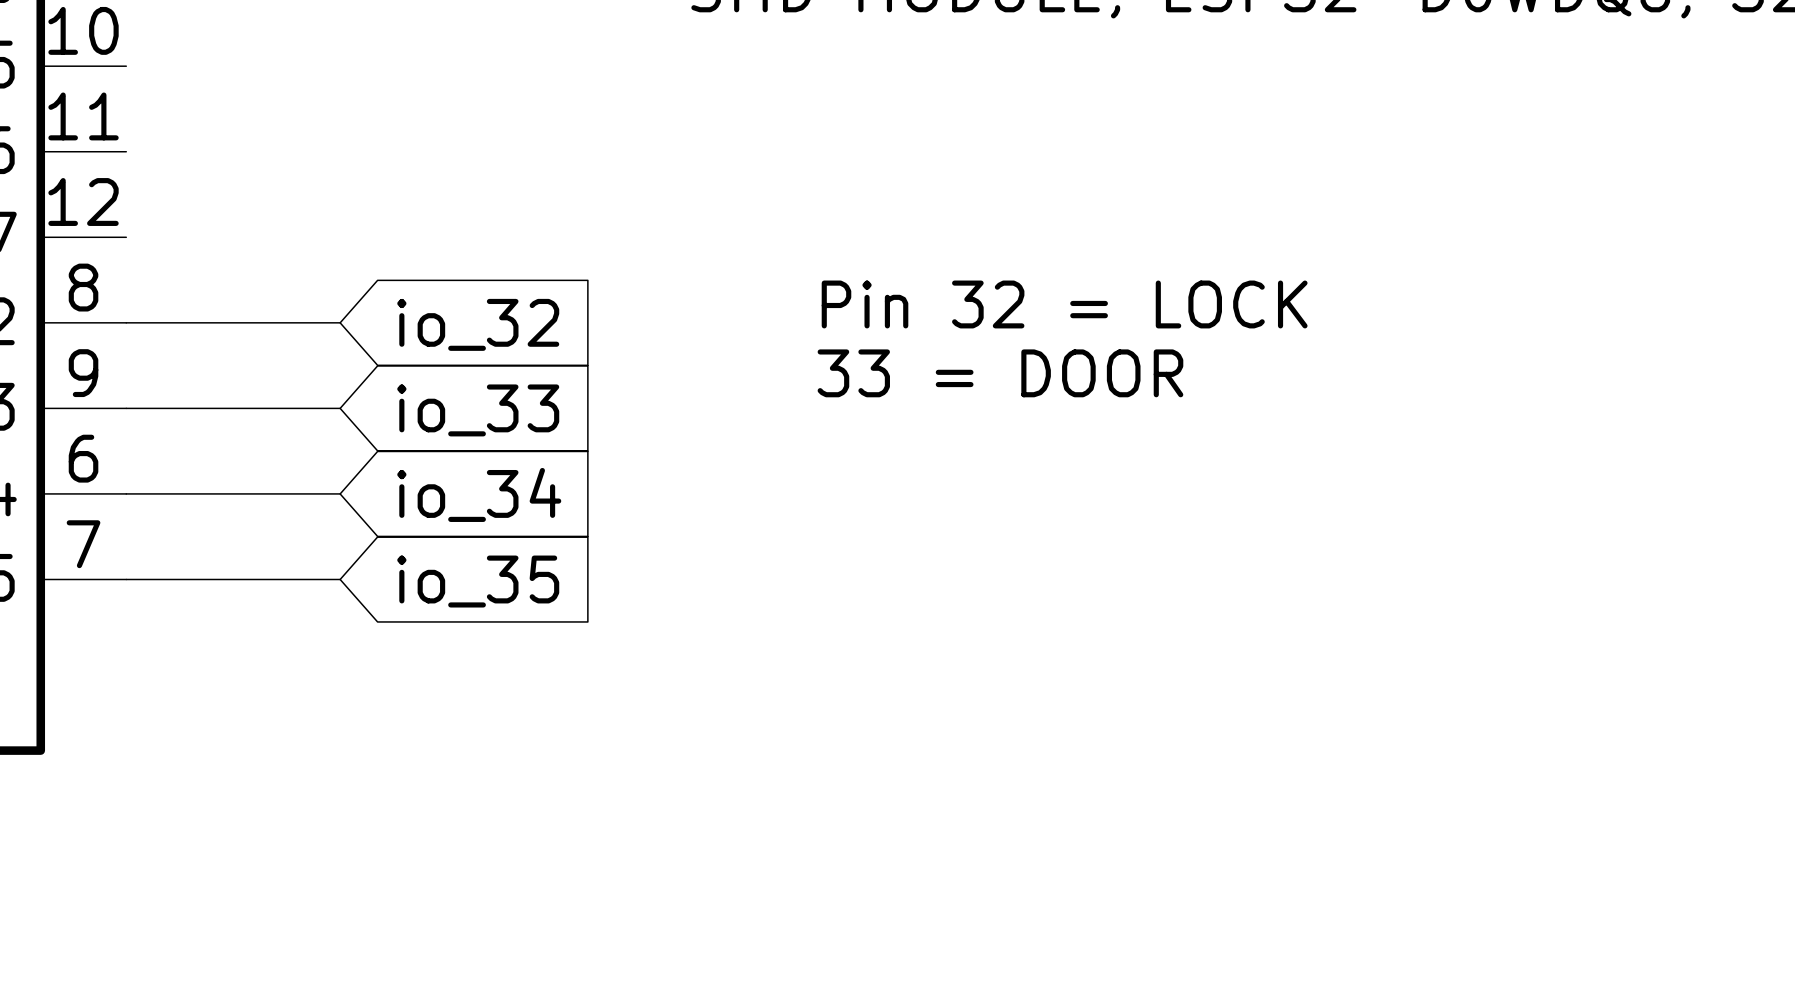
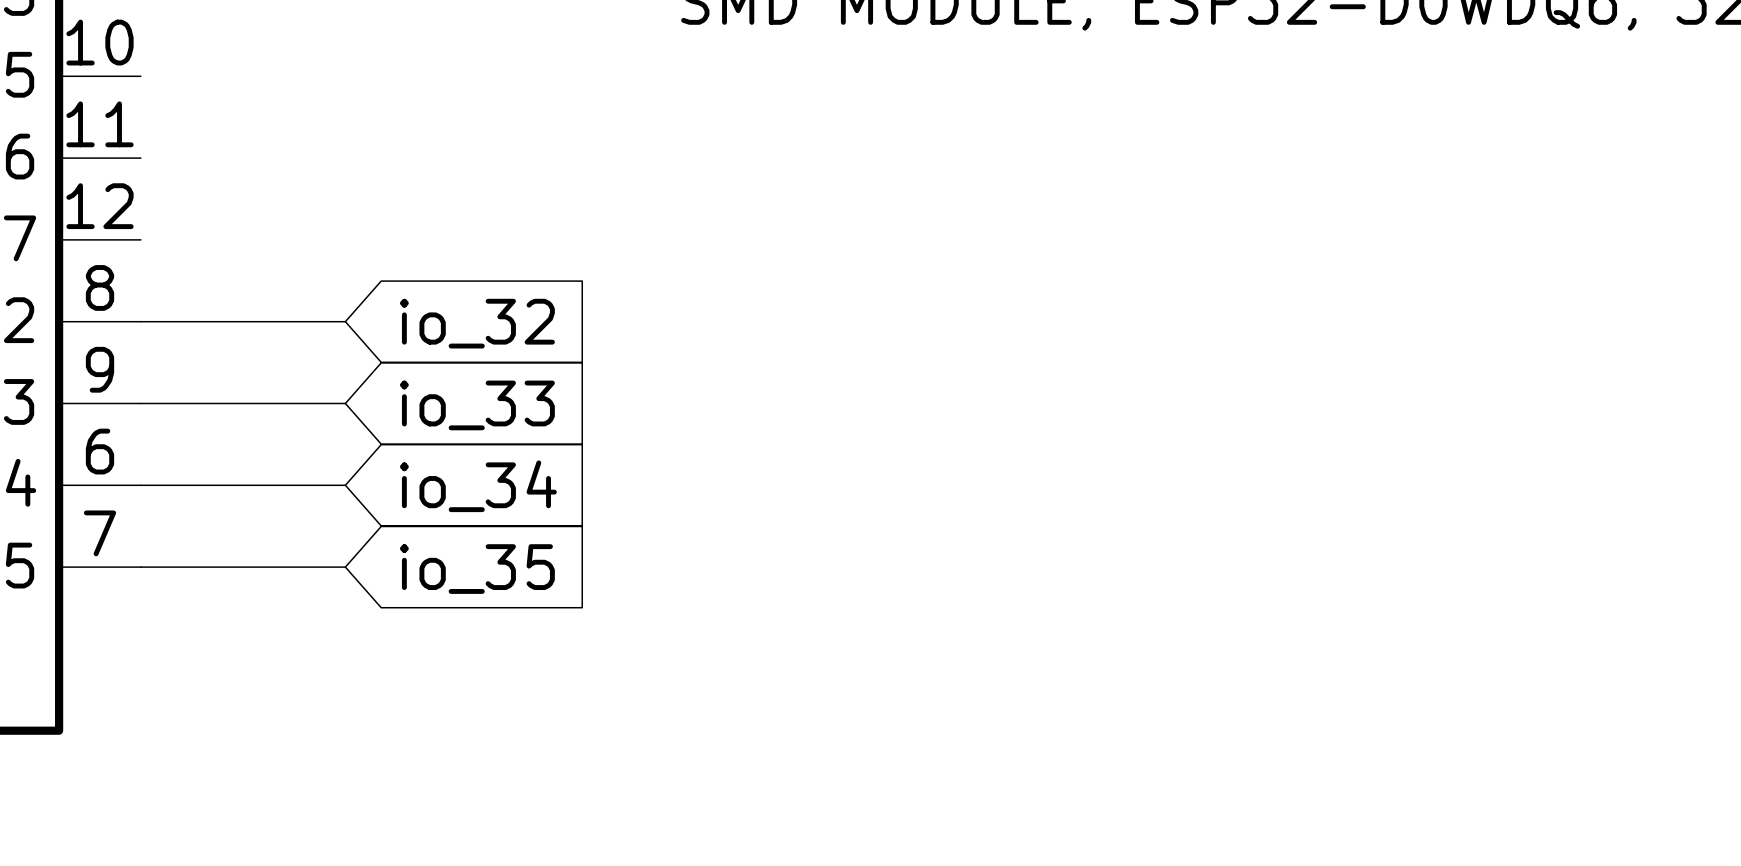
text: Pin 32 = LOCK (1064, 304) -> none
text: 33 = DOOR (1000, 373) -> none

